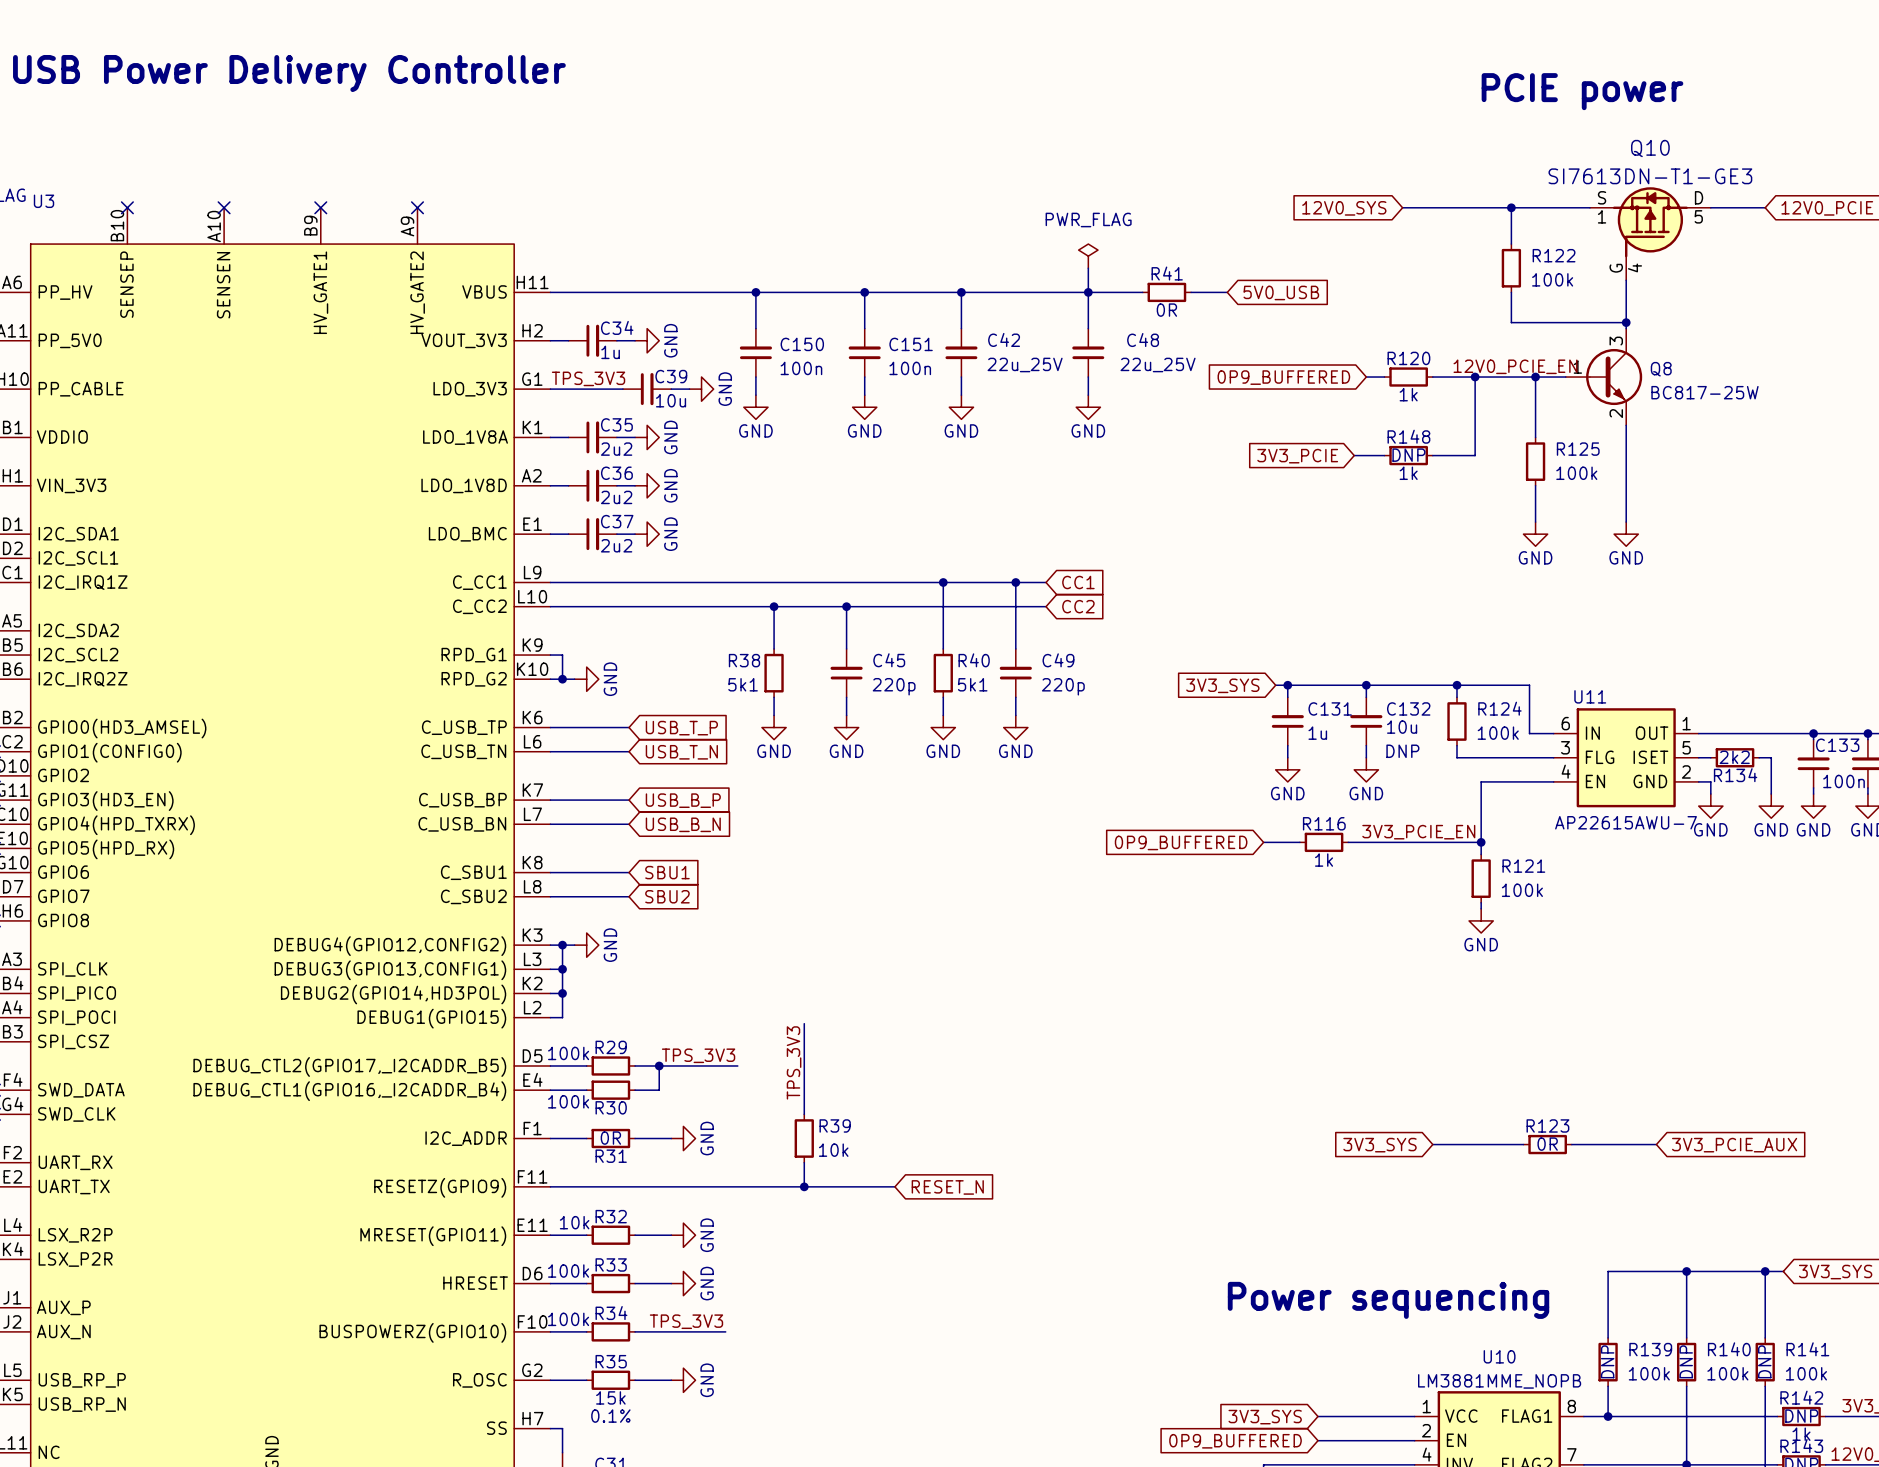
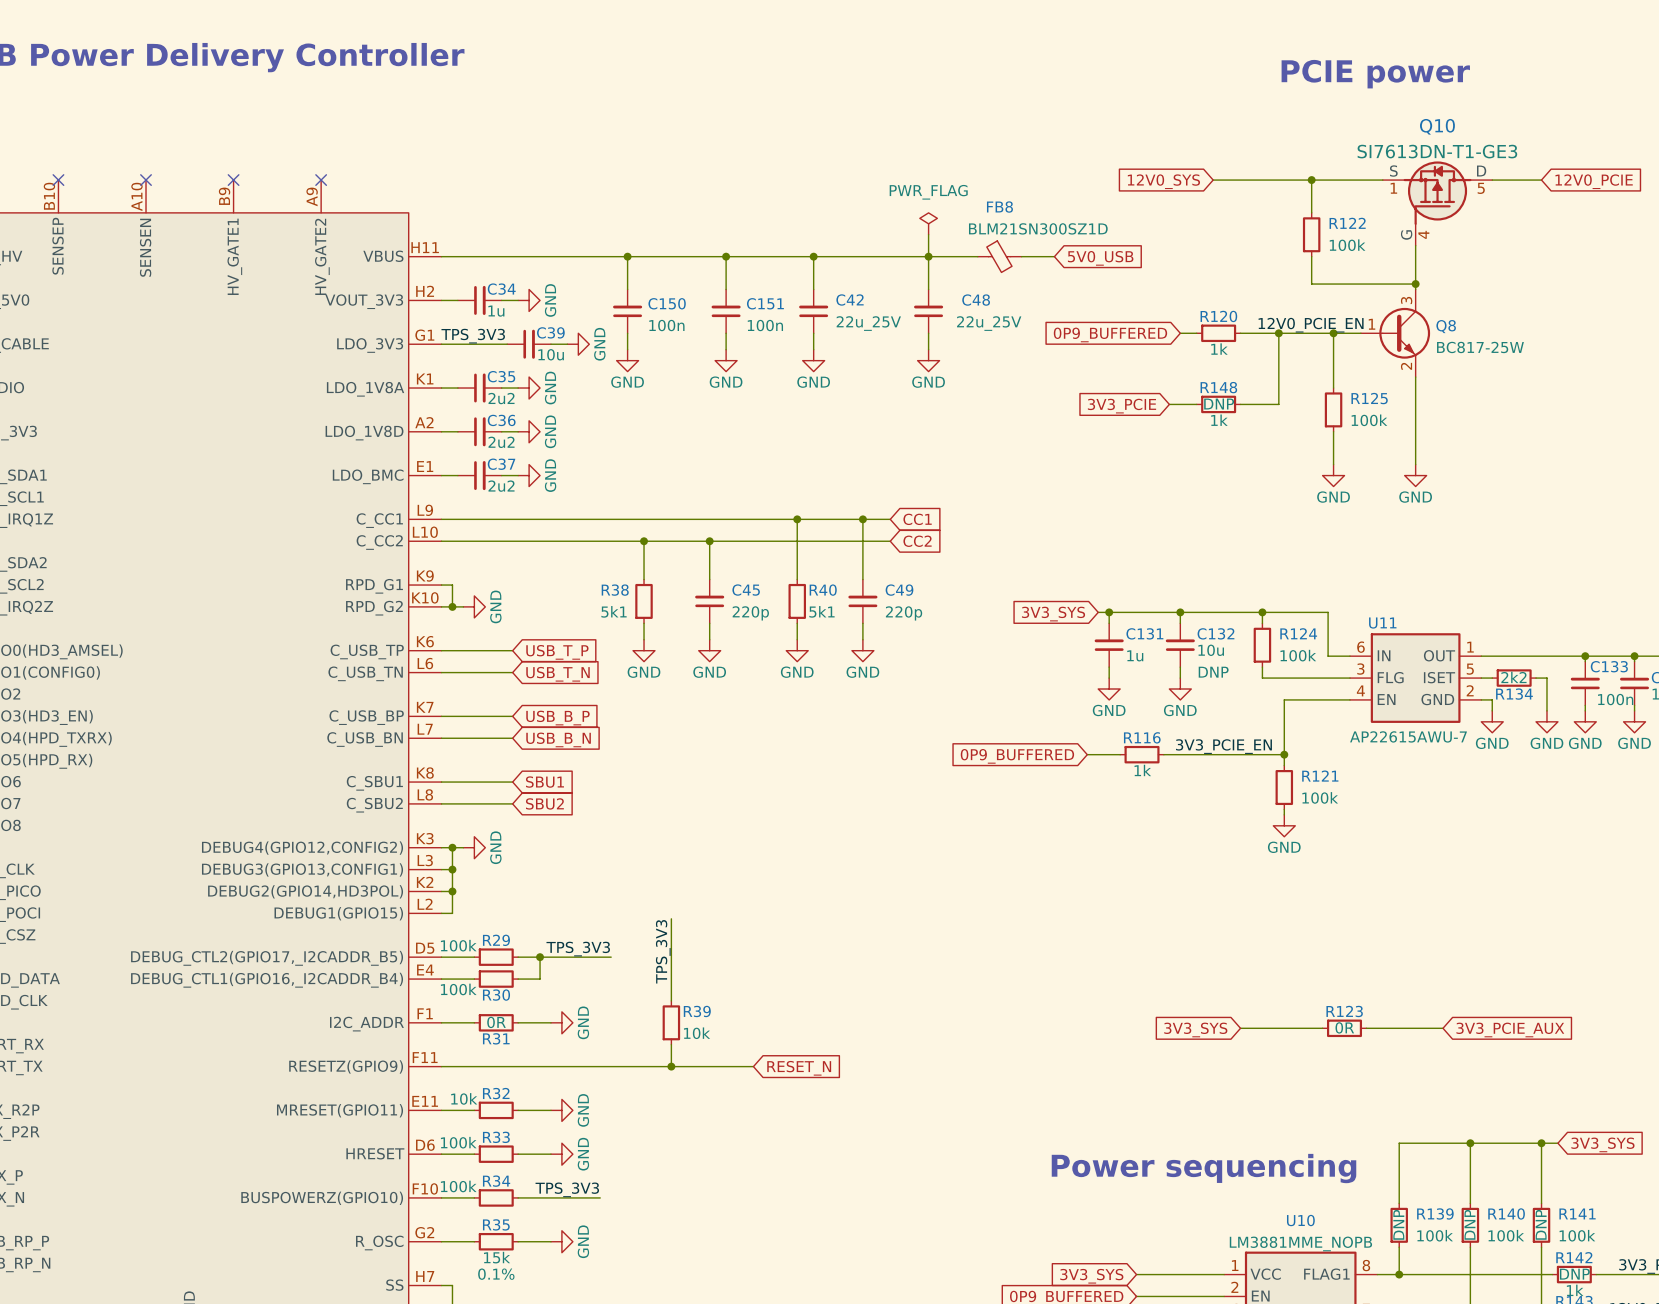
R41: (1166, 292) -> none
FB8: none -> BLM21SN300SZ1D (999, 256)

